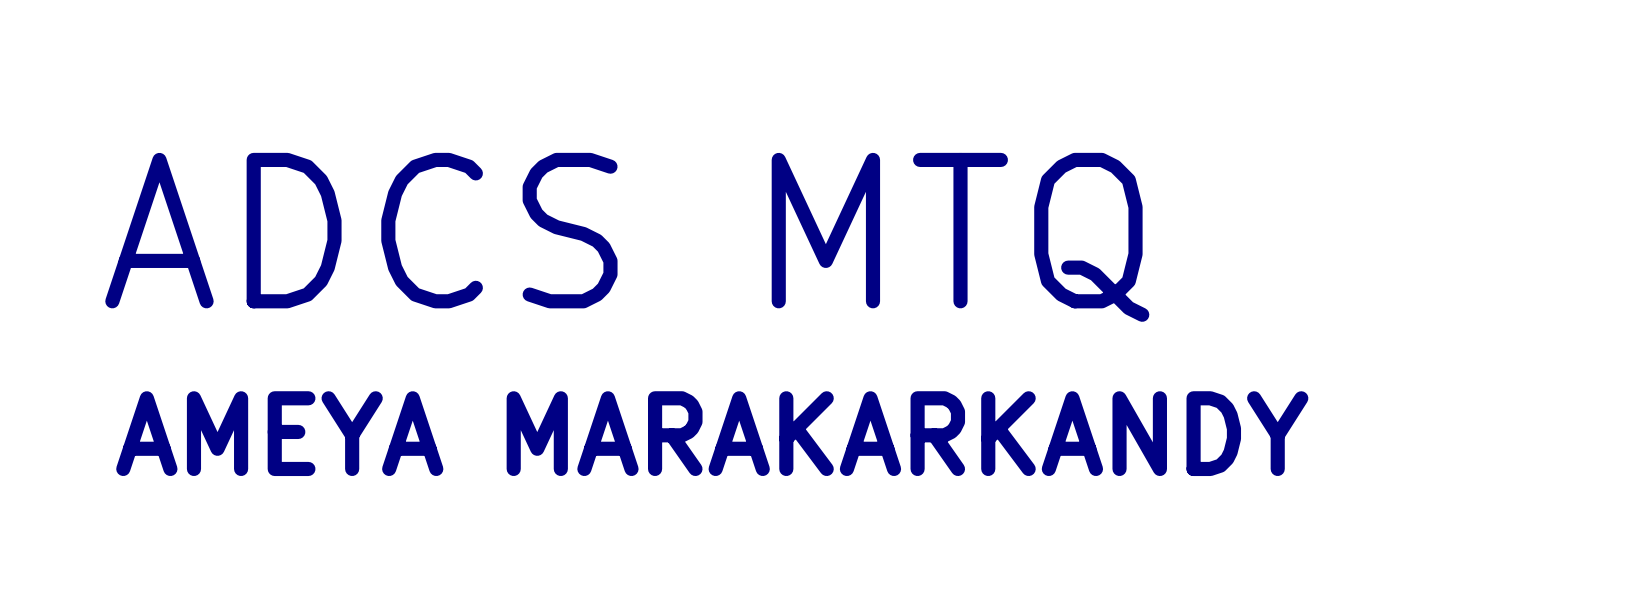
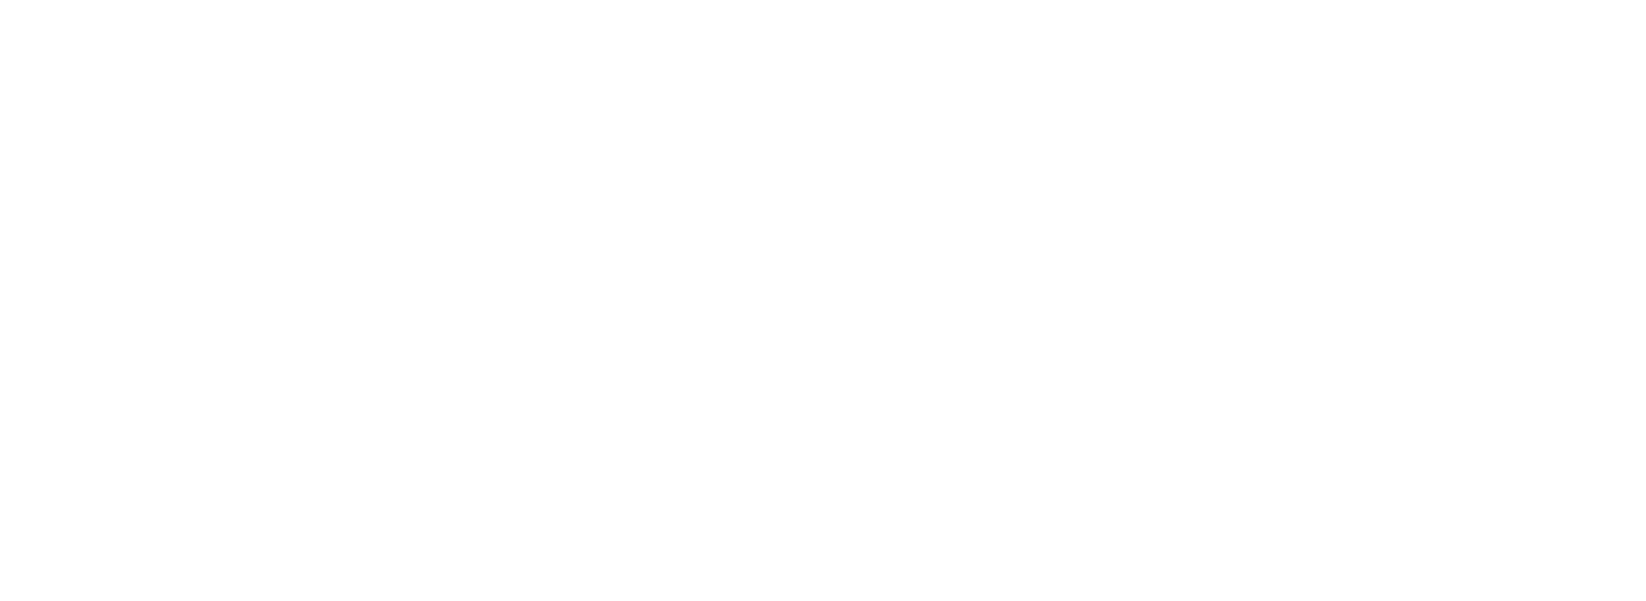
text: ADCS MTQ (627, 237) -> none
text: AMEYA MARAKARKANDY (712, 433) -> none

